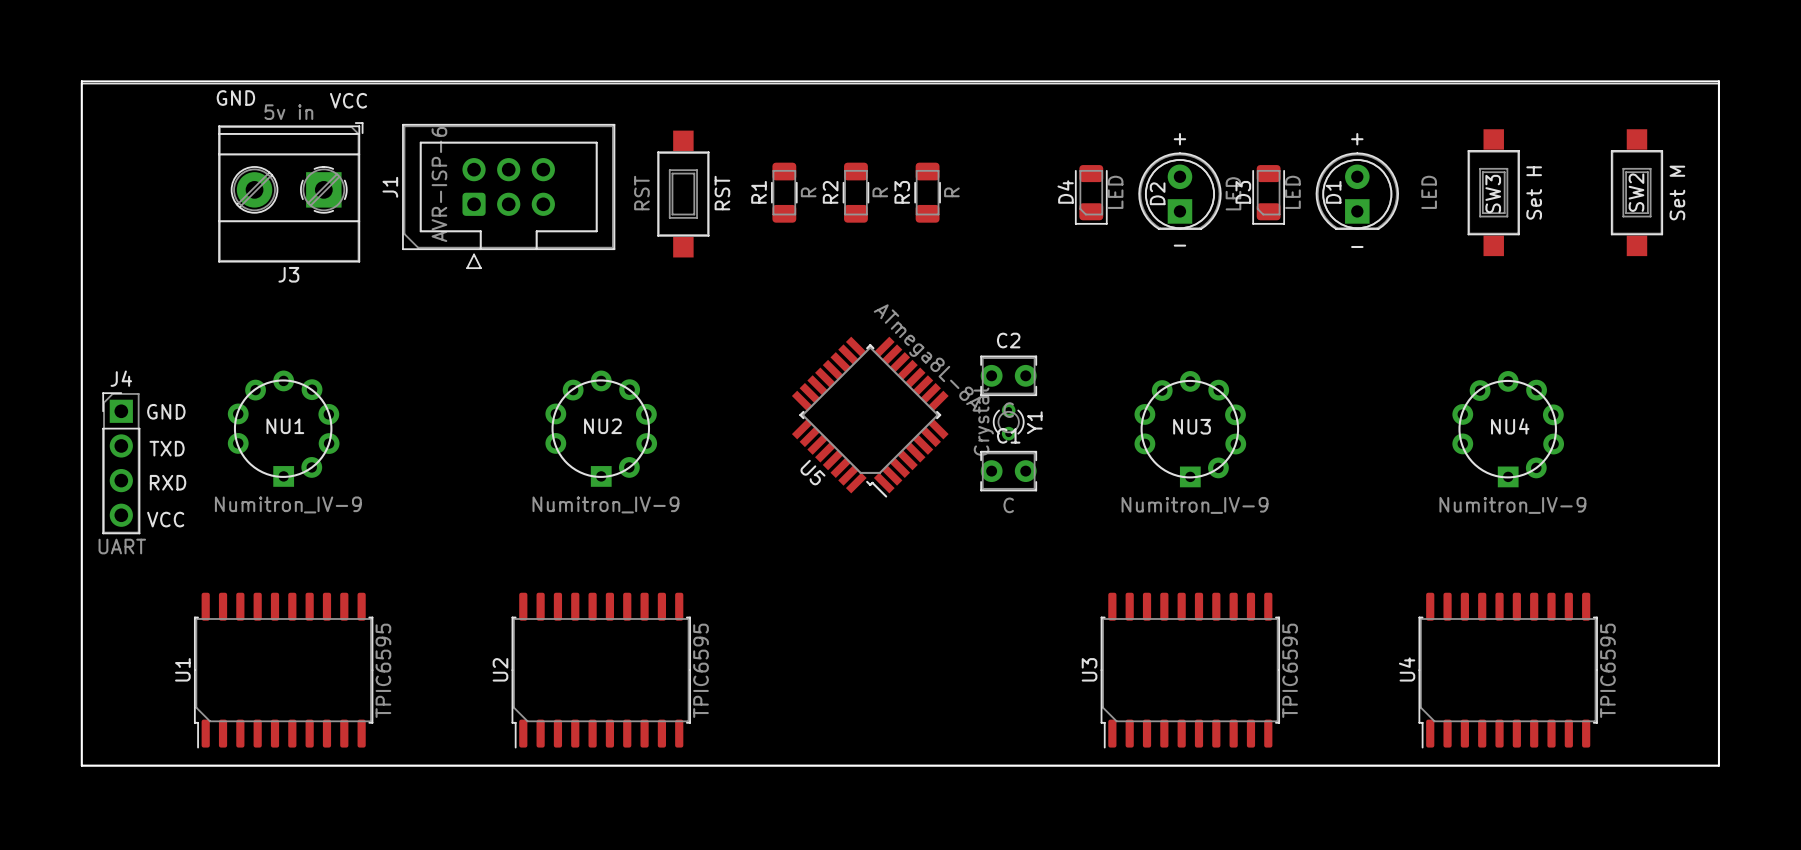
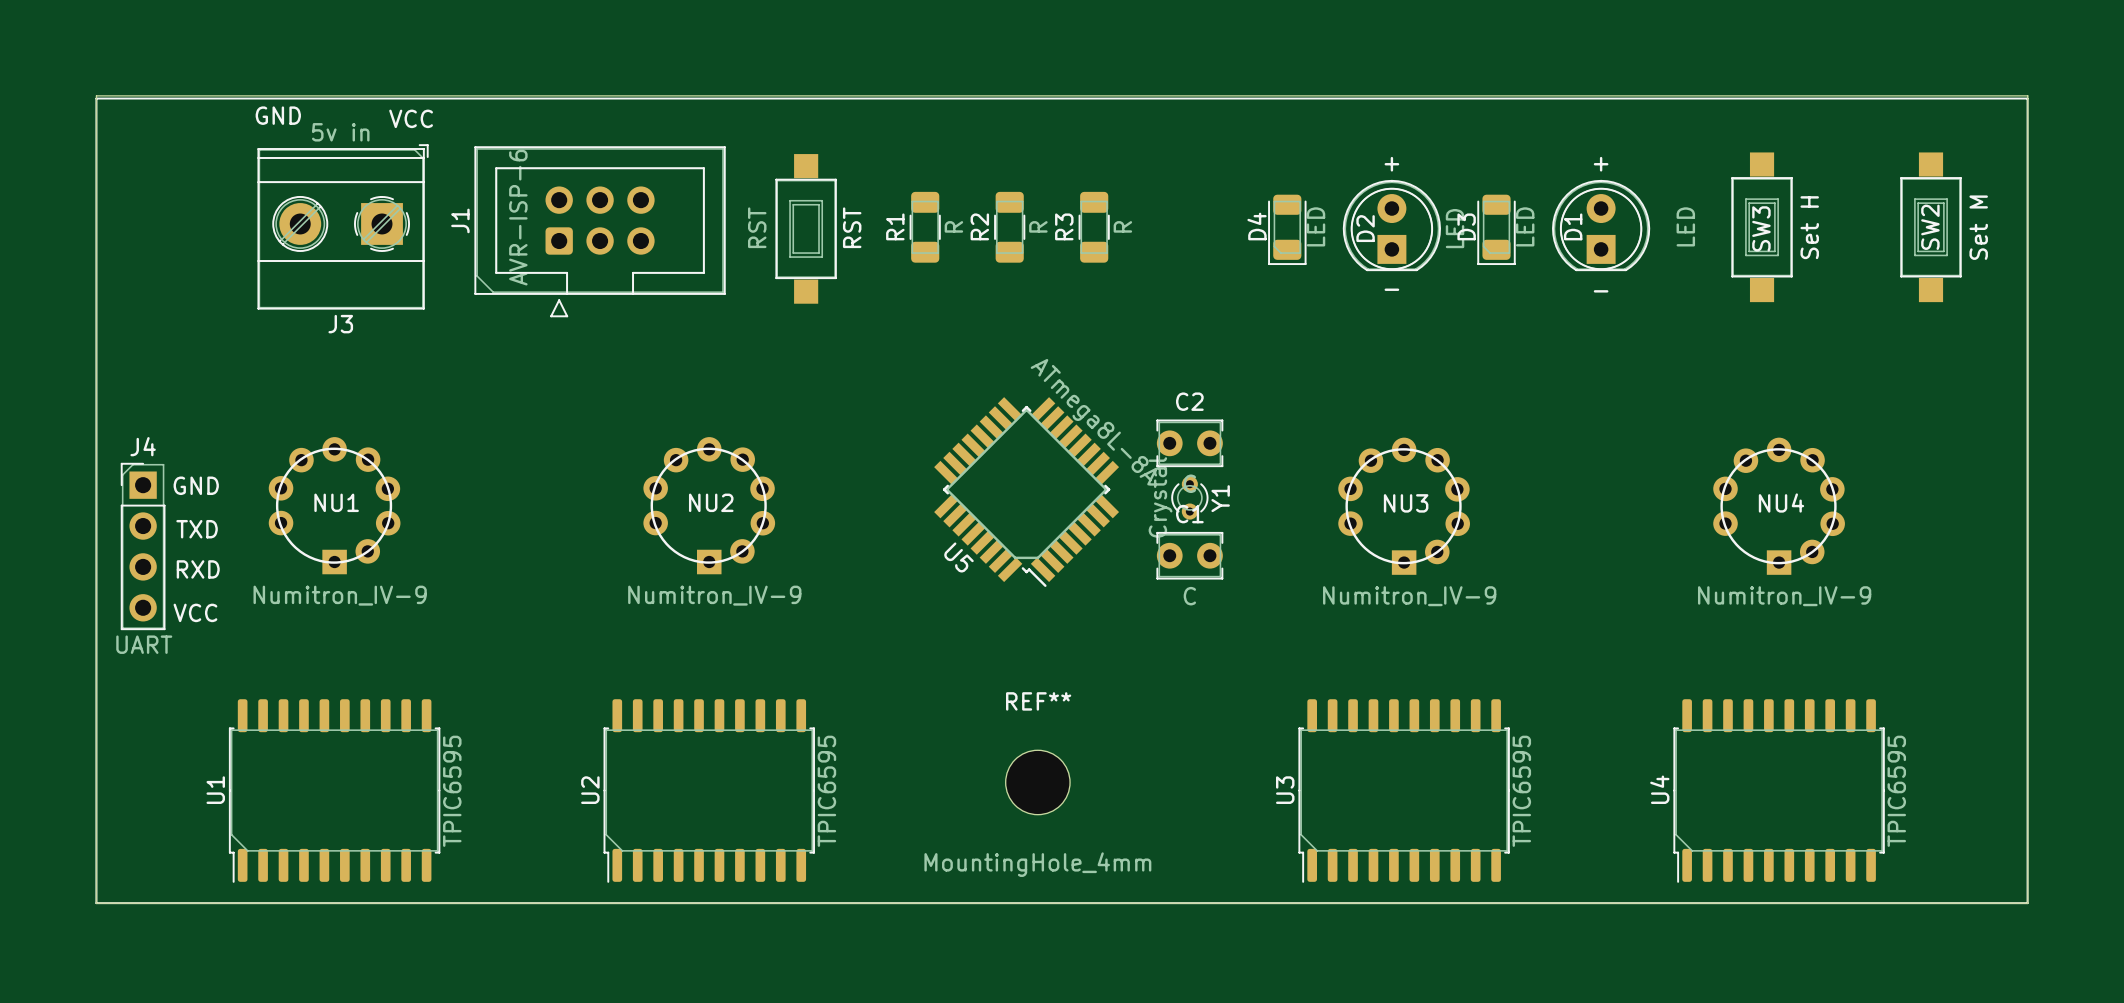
REF**: none -> MountingHole_4mm (1037, 782)

